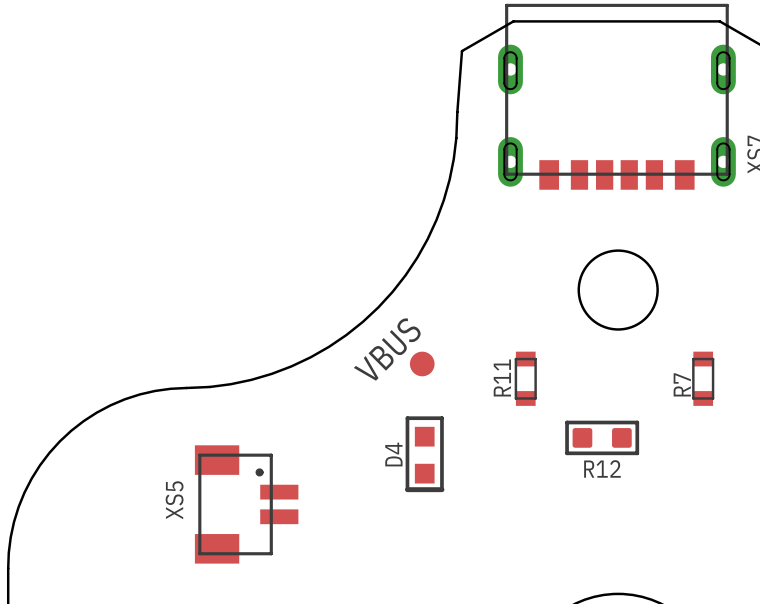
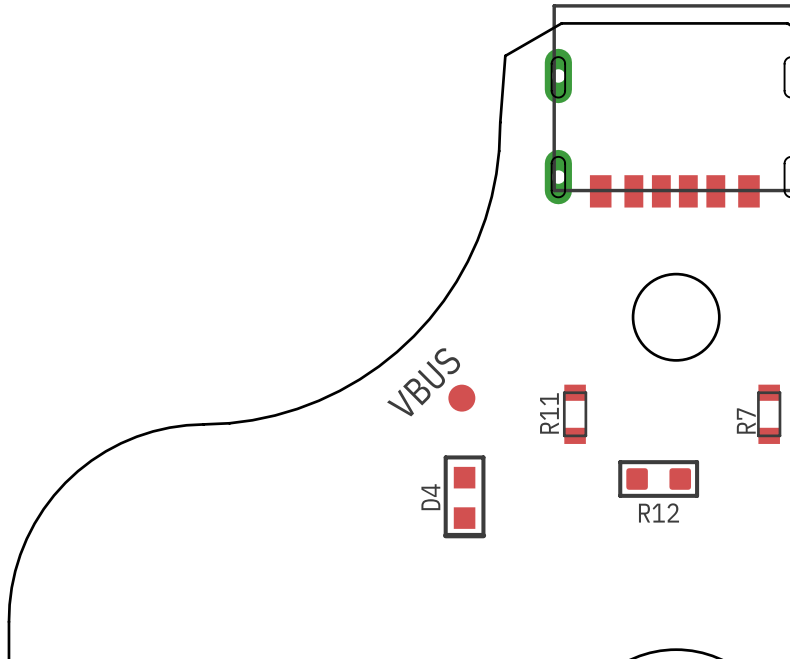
XS5: (246, 504) -> none

